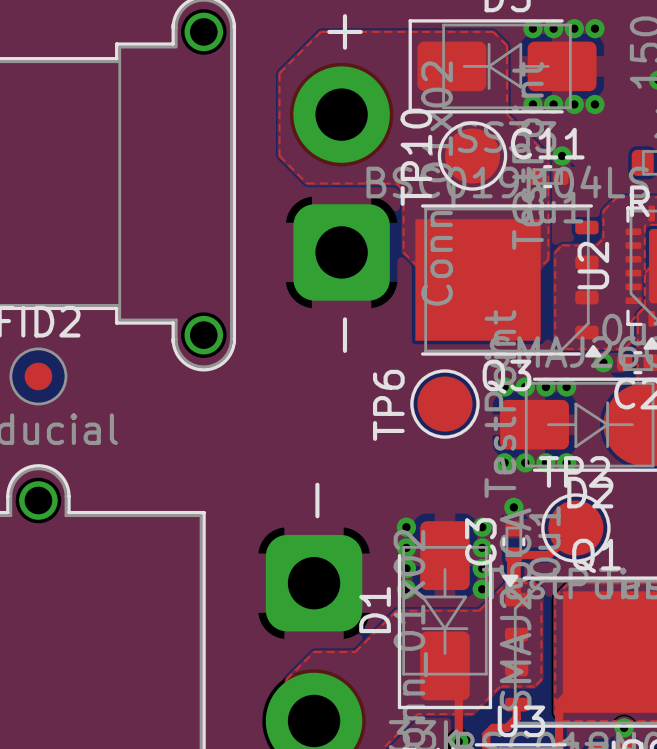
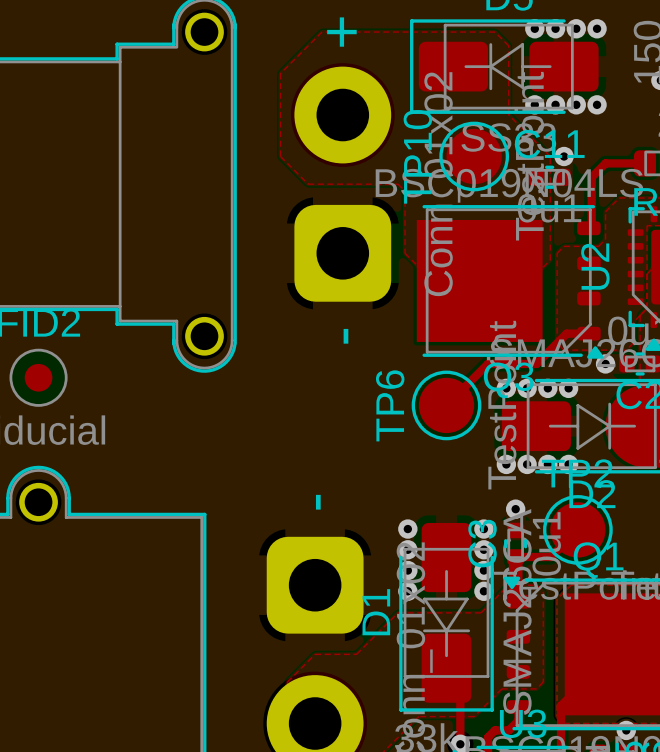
top track: none -> (644, 163) (605, 163) (591, 177) (591, 225) (588, 228)
top track: none -> (588, 333) (566, 333) (536, 363) (488, 363) (446, 405)

